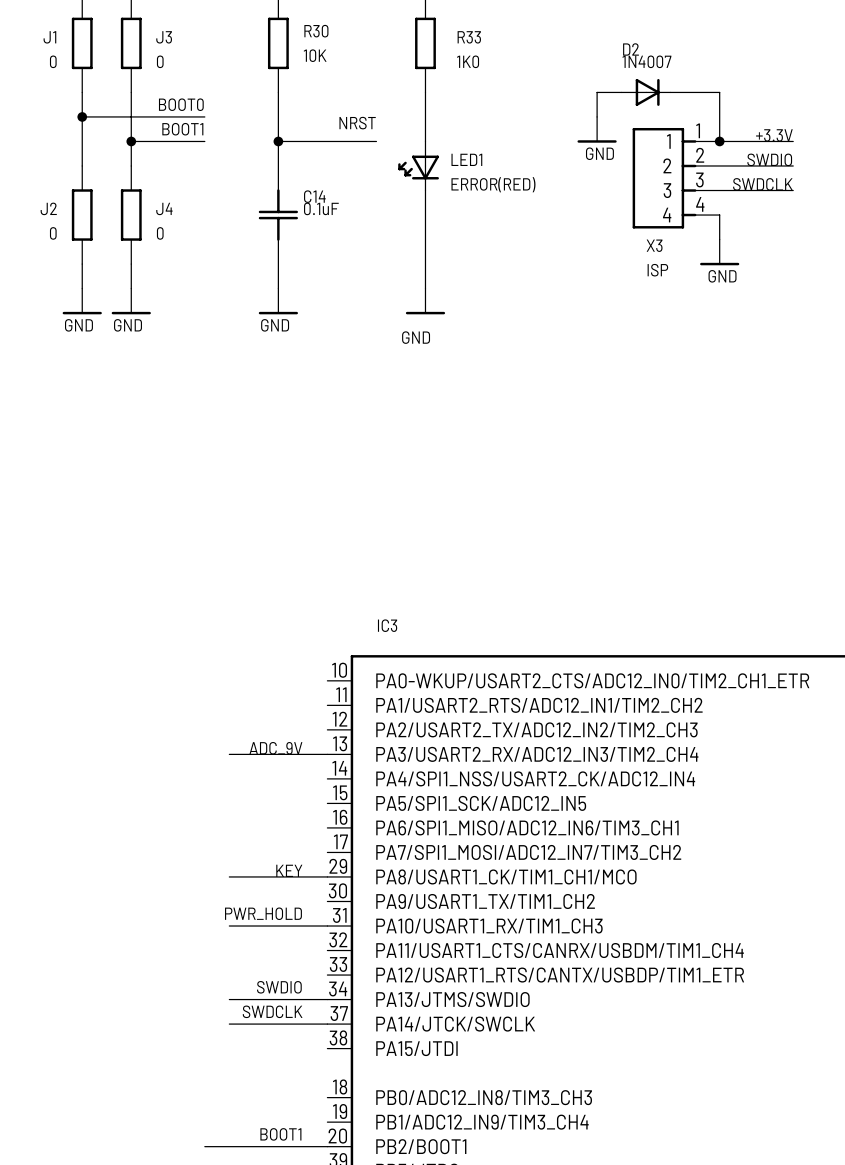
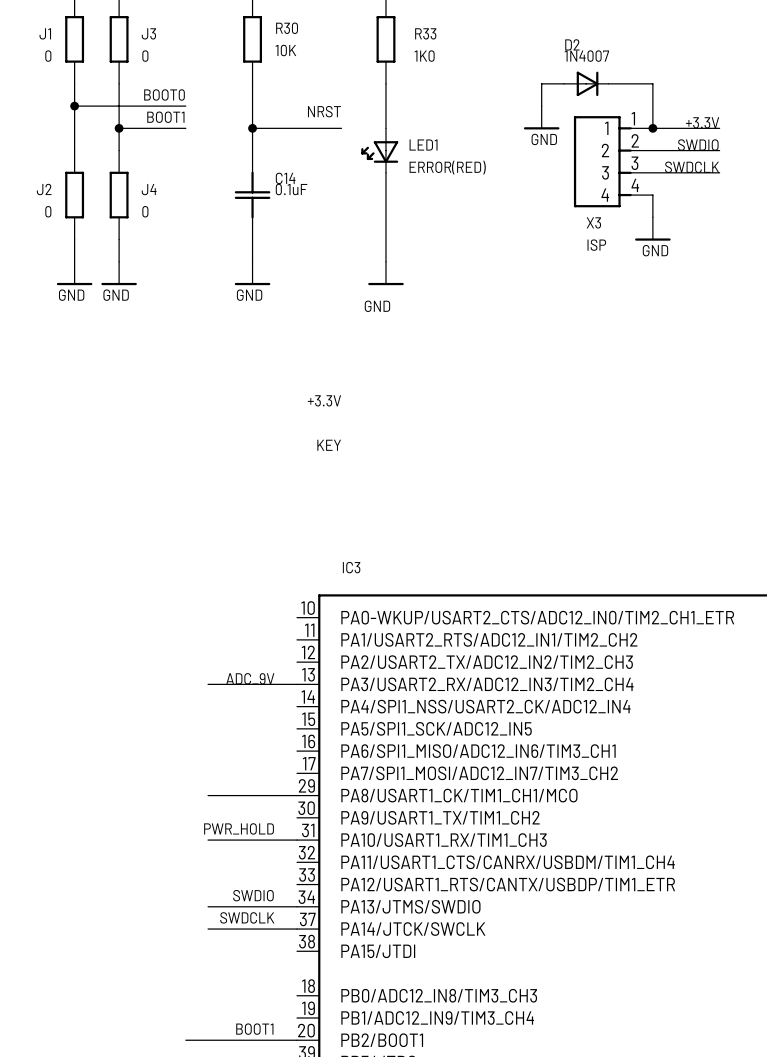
label: none -> +3.3V (324, 400)
label: none -> KEY (329, 445)
label: KEY (289, 870) -> none

